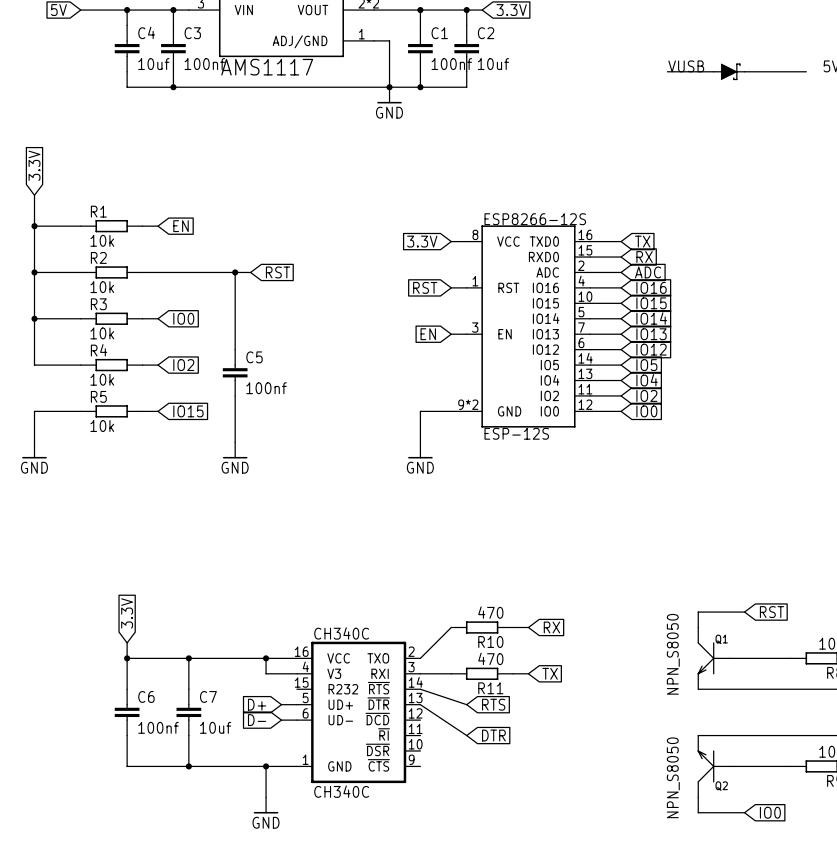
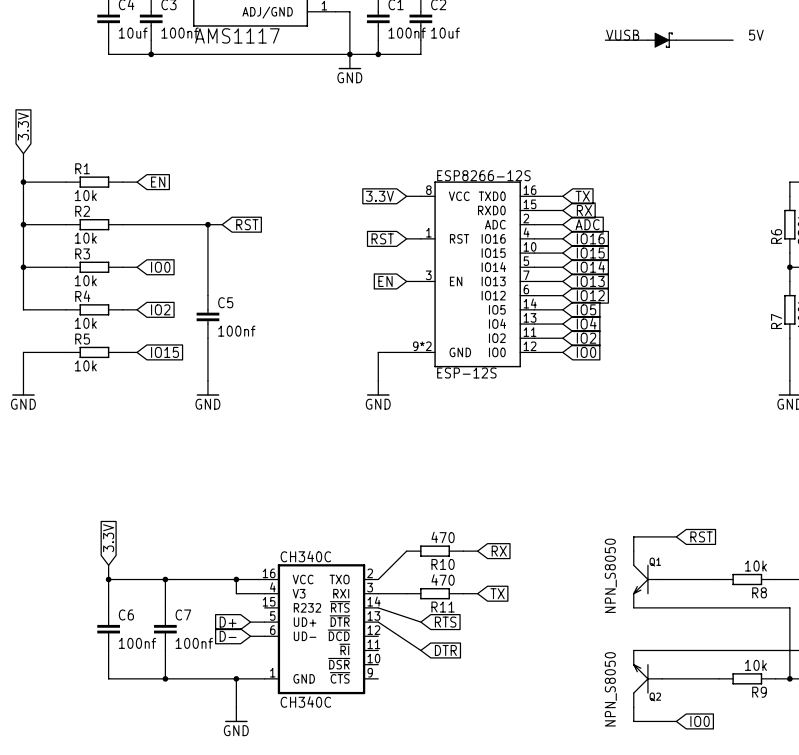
C7 value: 10uf (215, 727) -> 100nf (194, 643)

